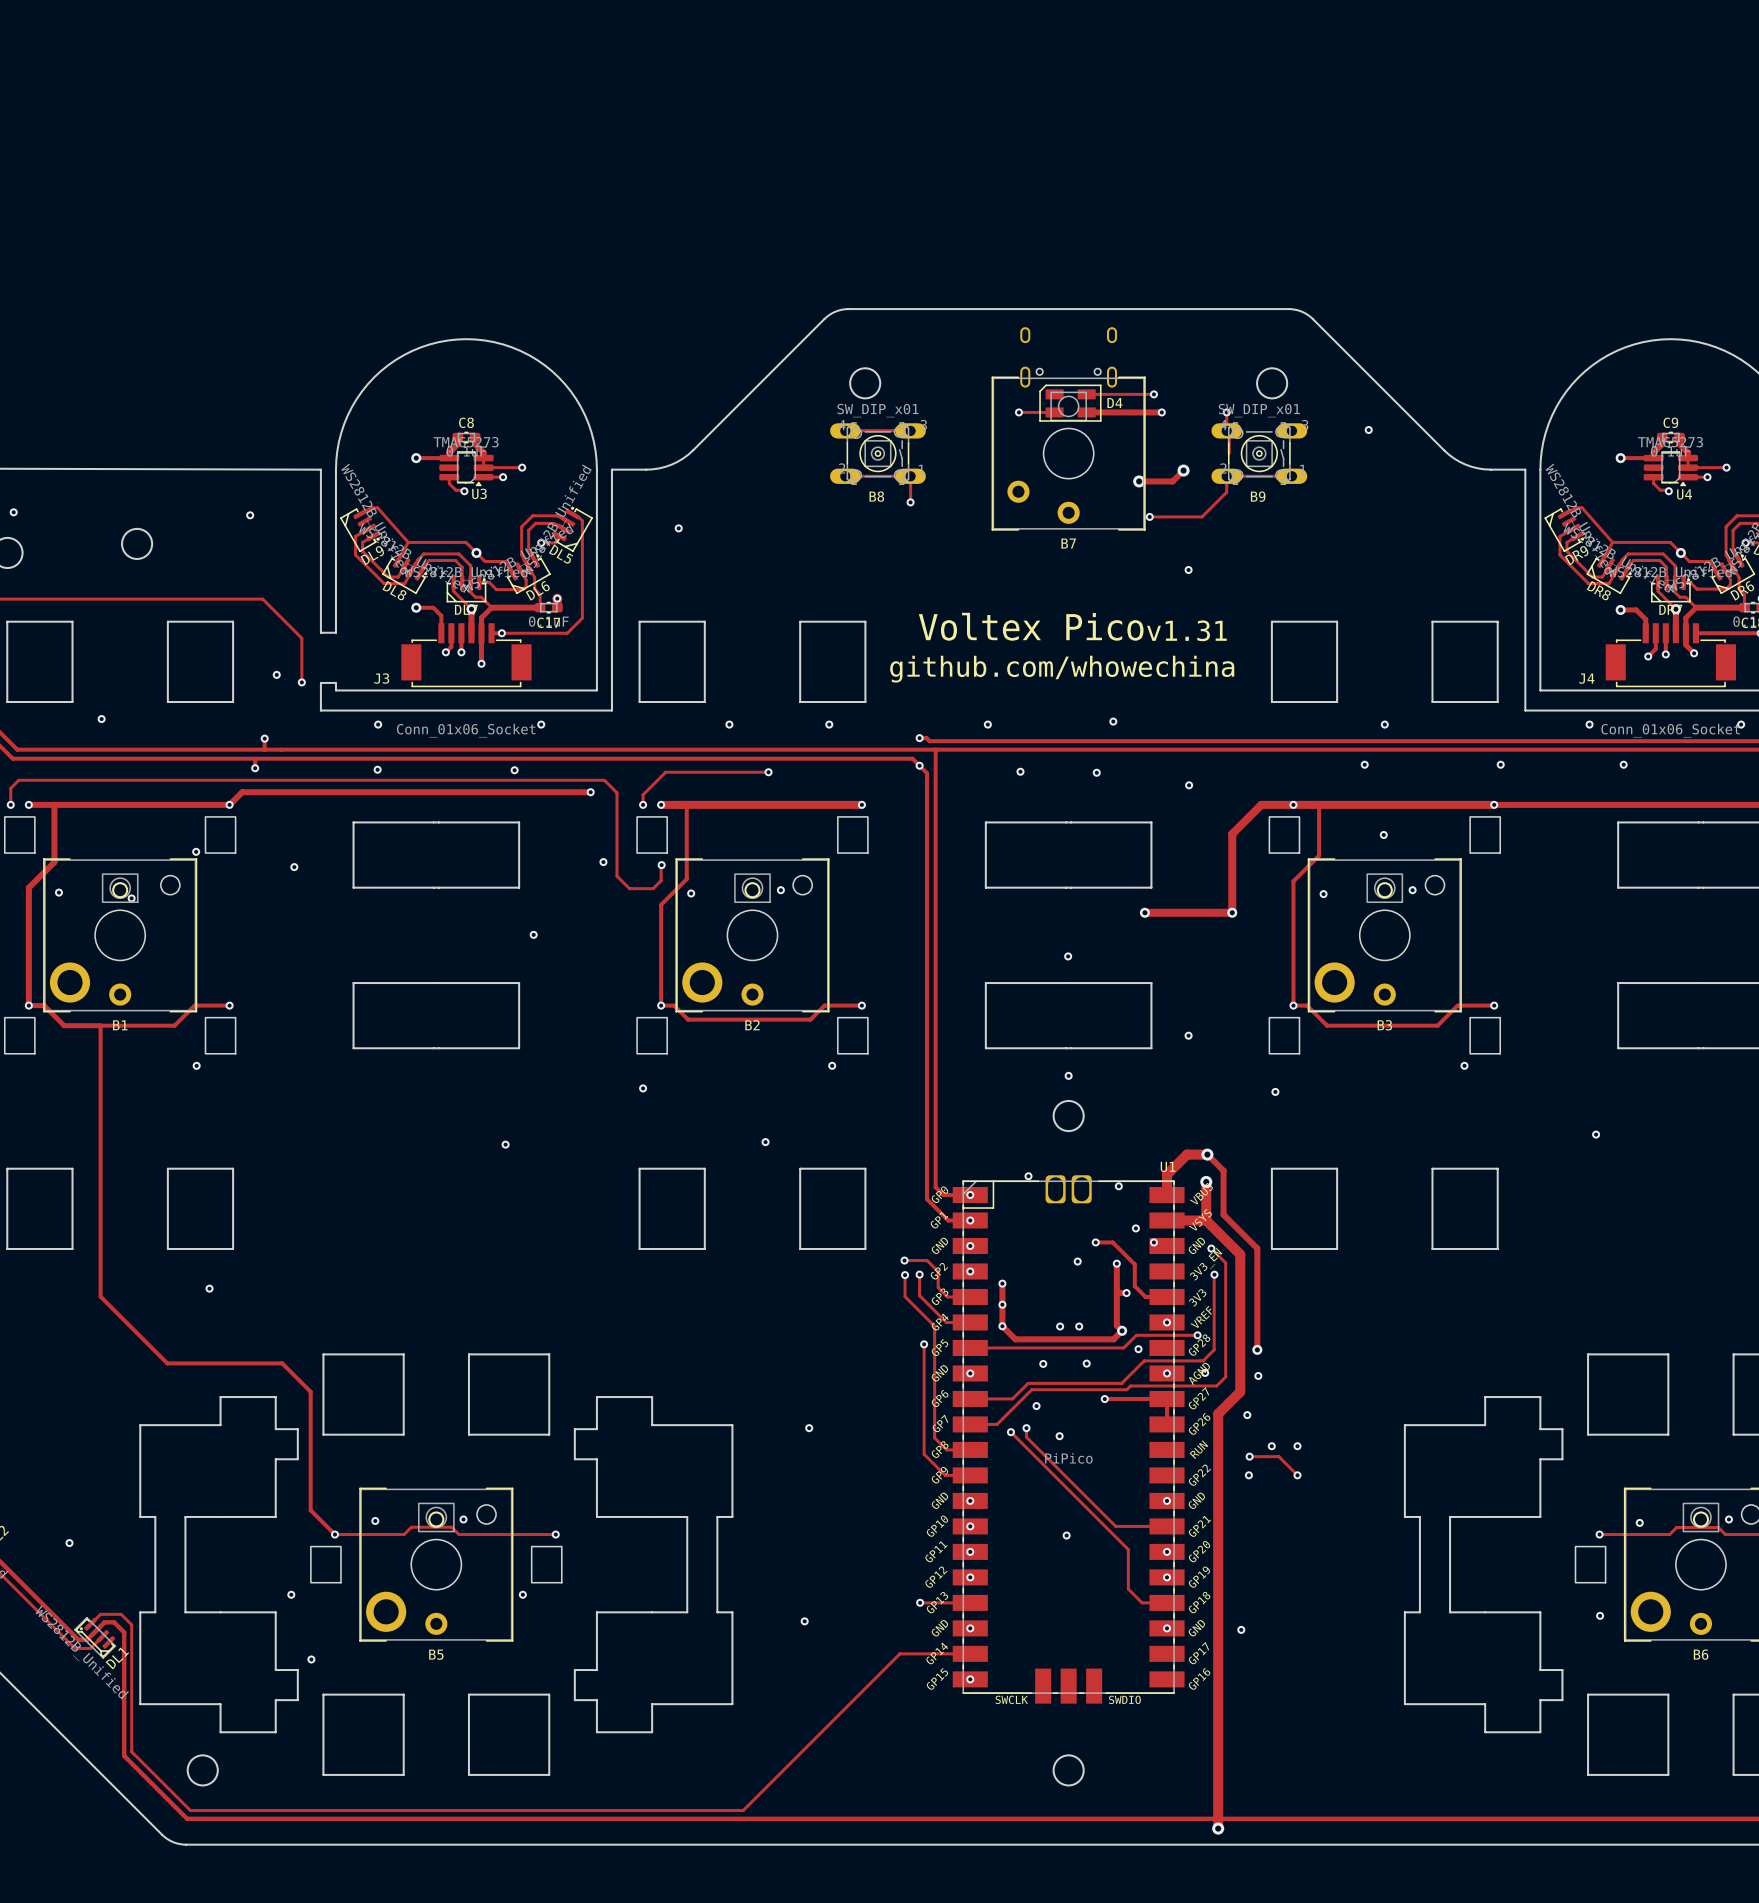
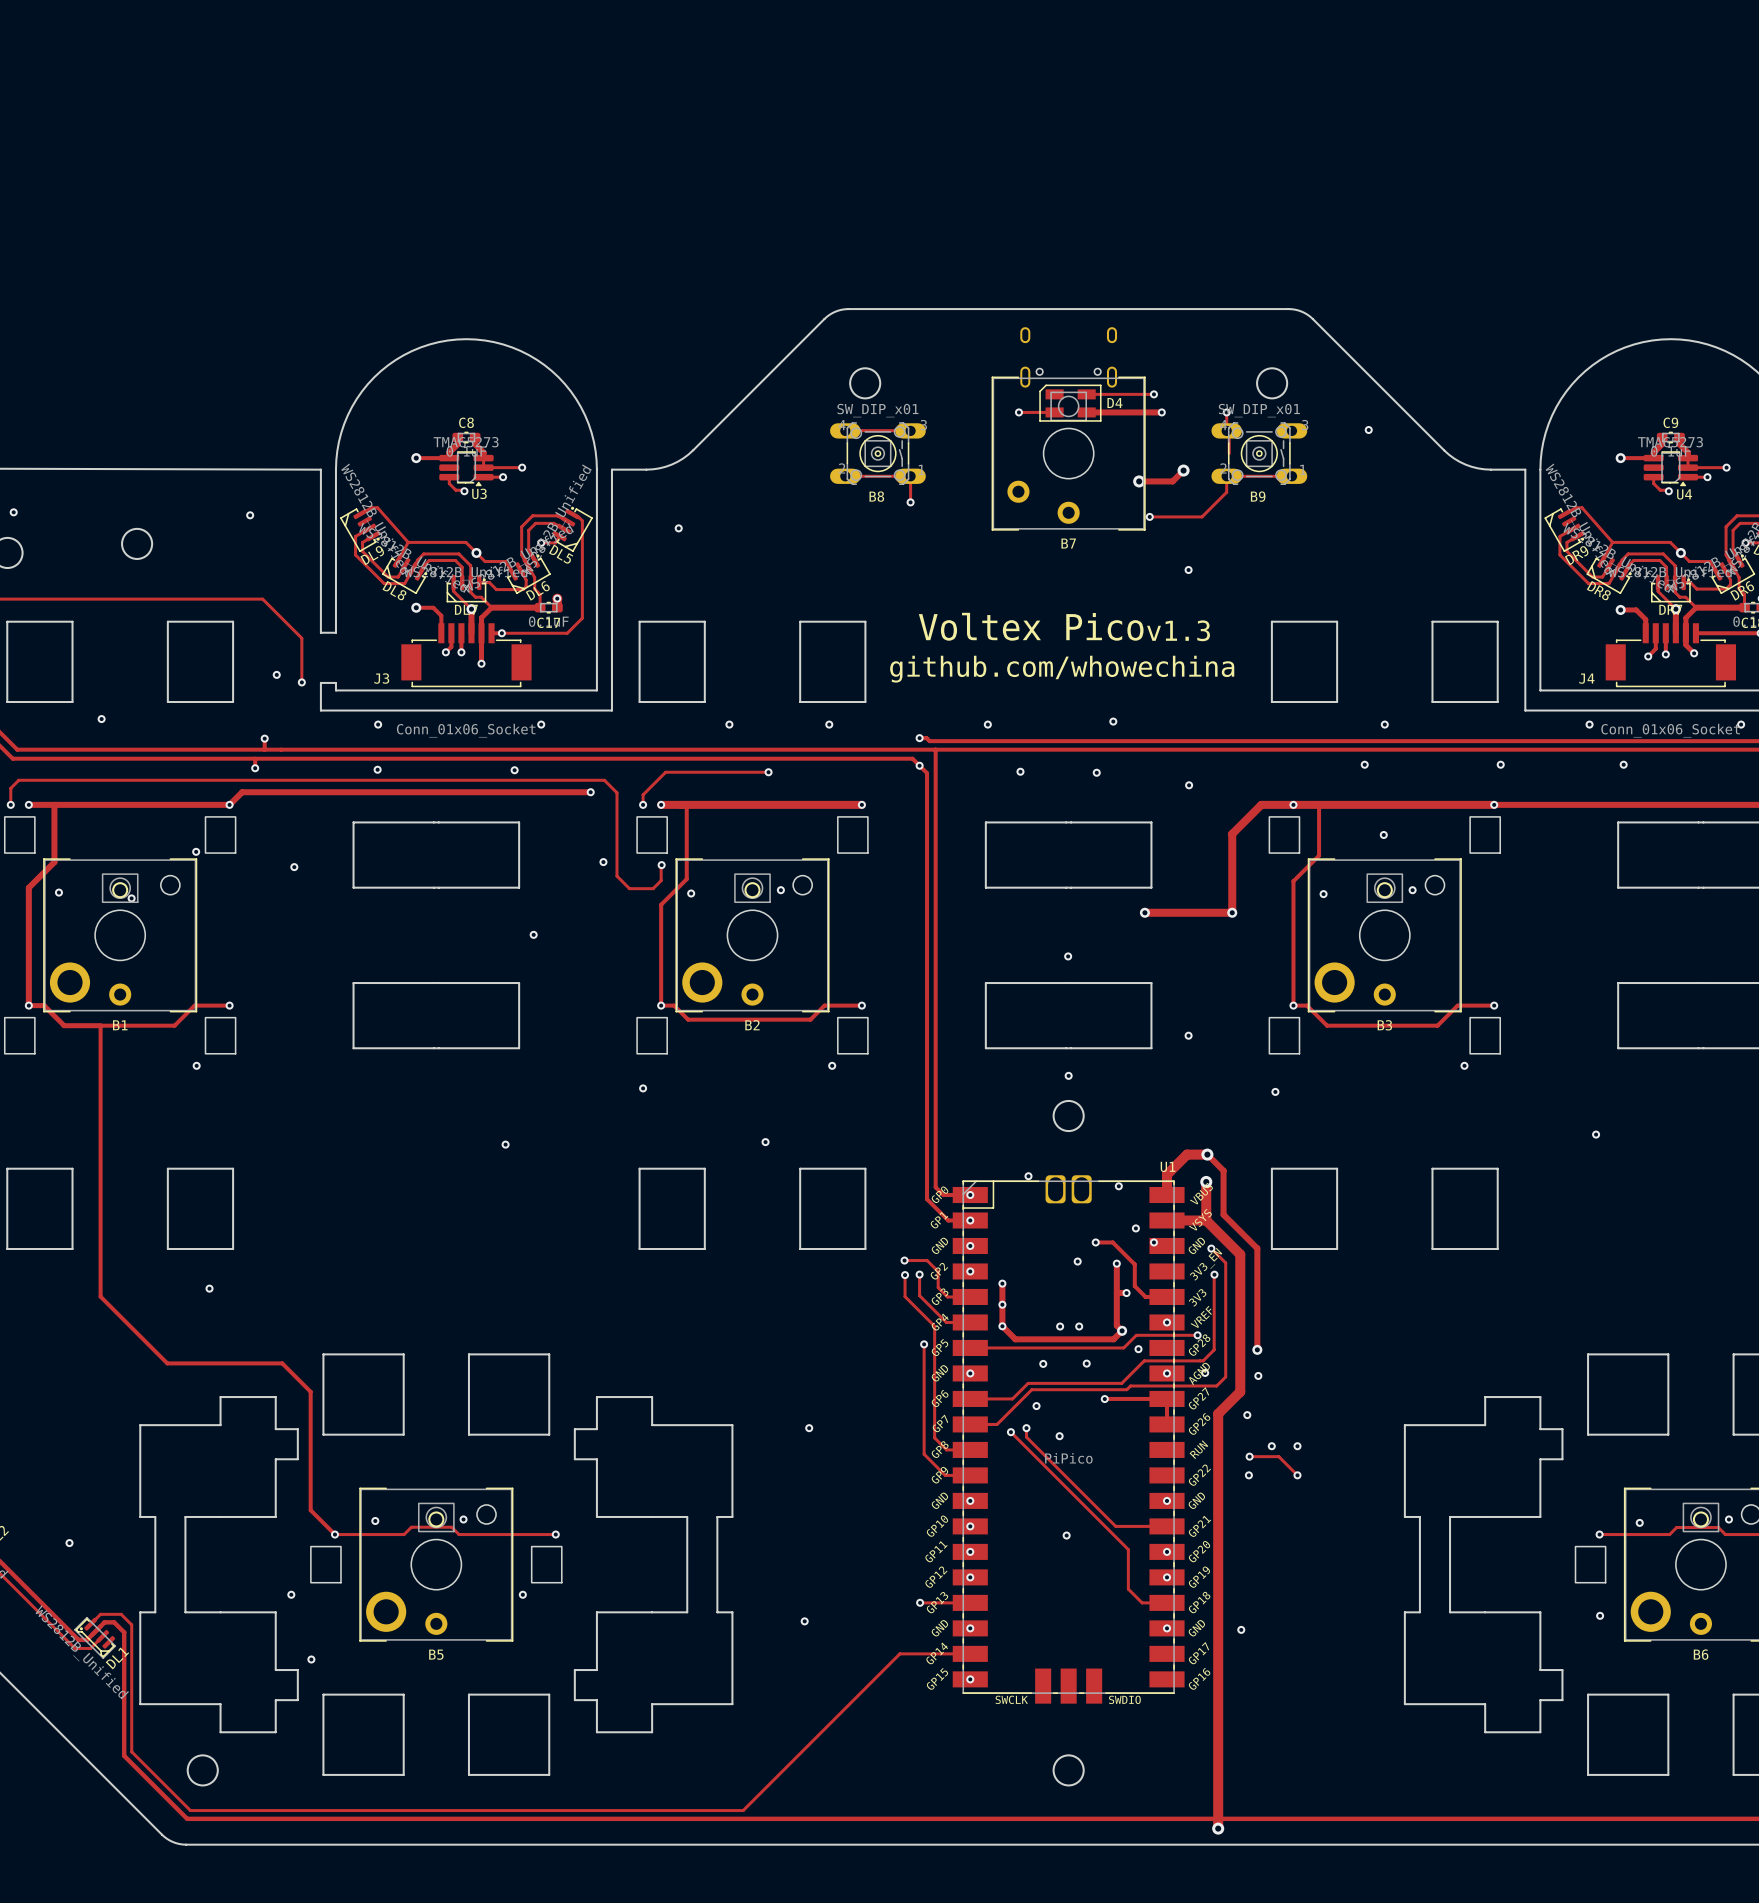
text: v1.31 (1186, 630) -> v1.3 (1178, 630)

